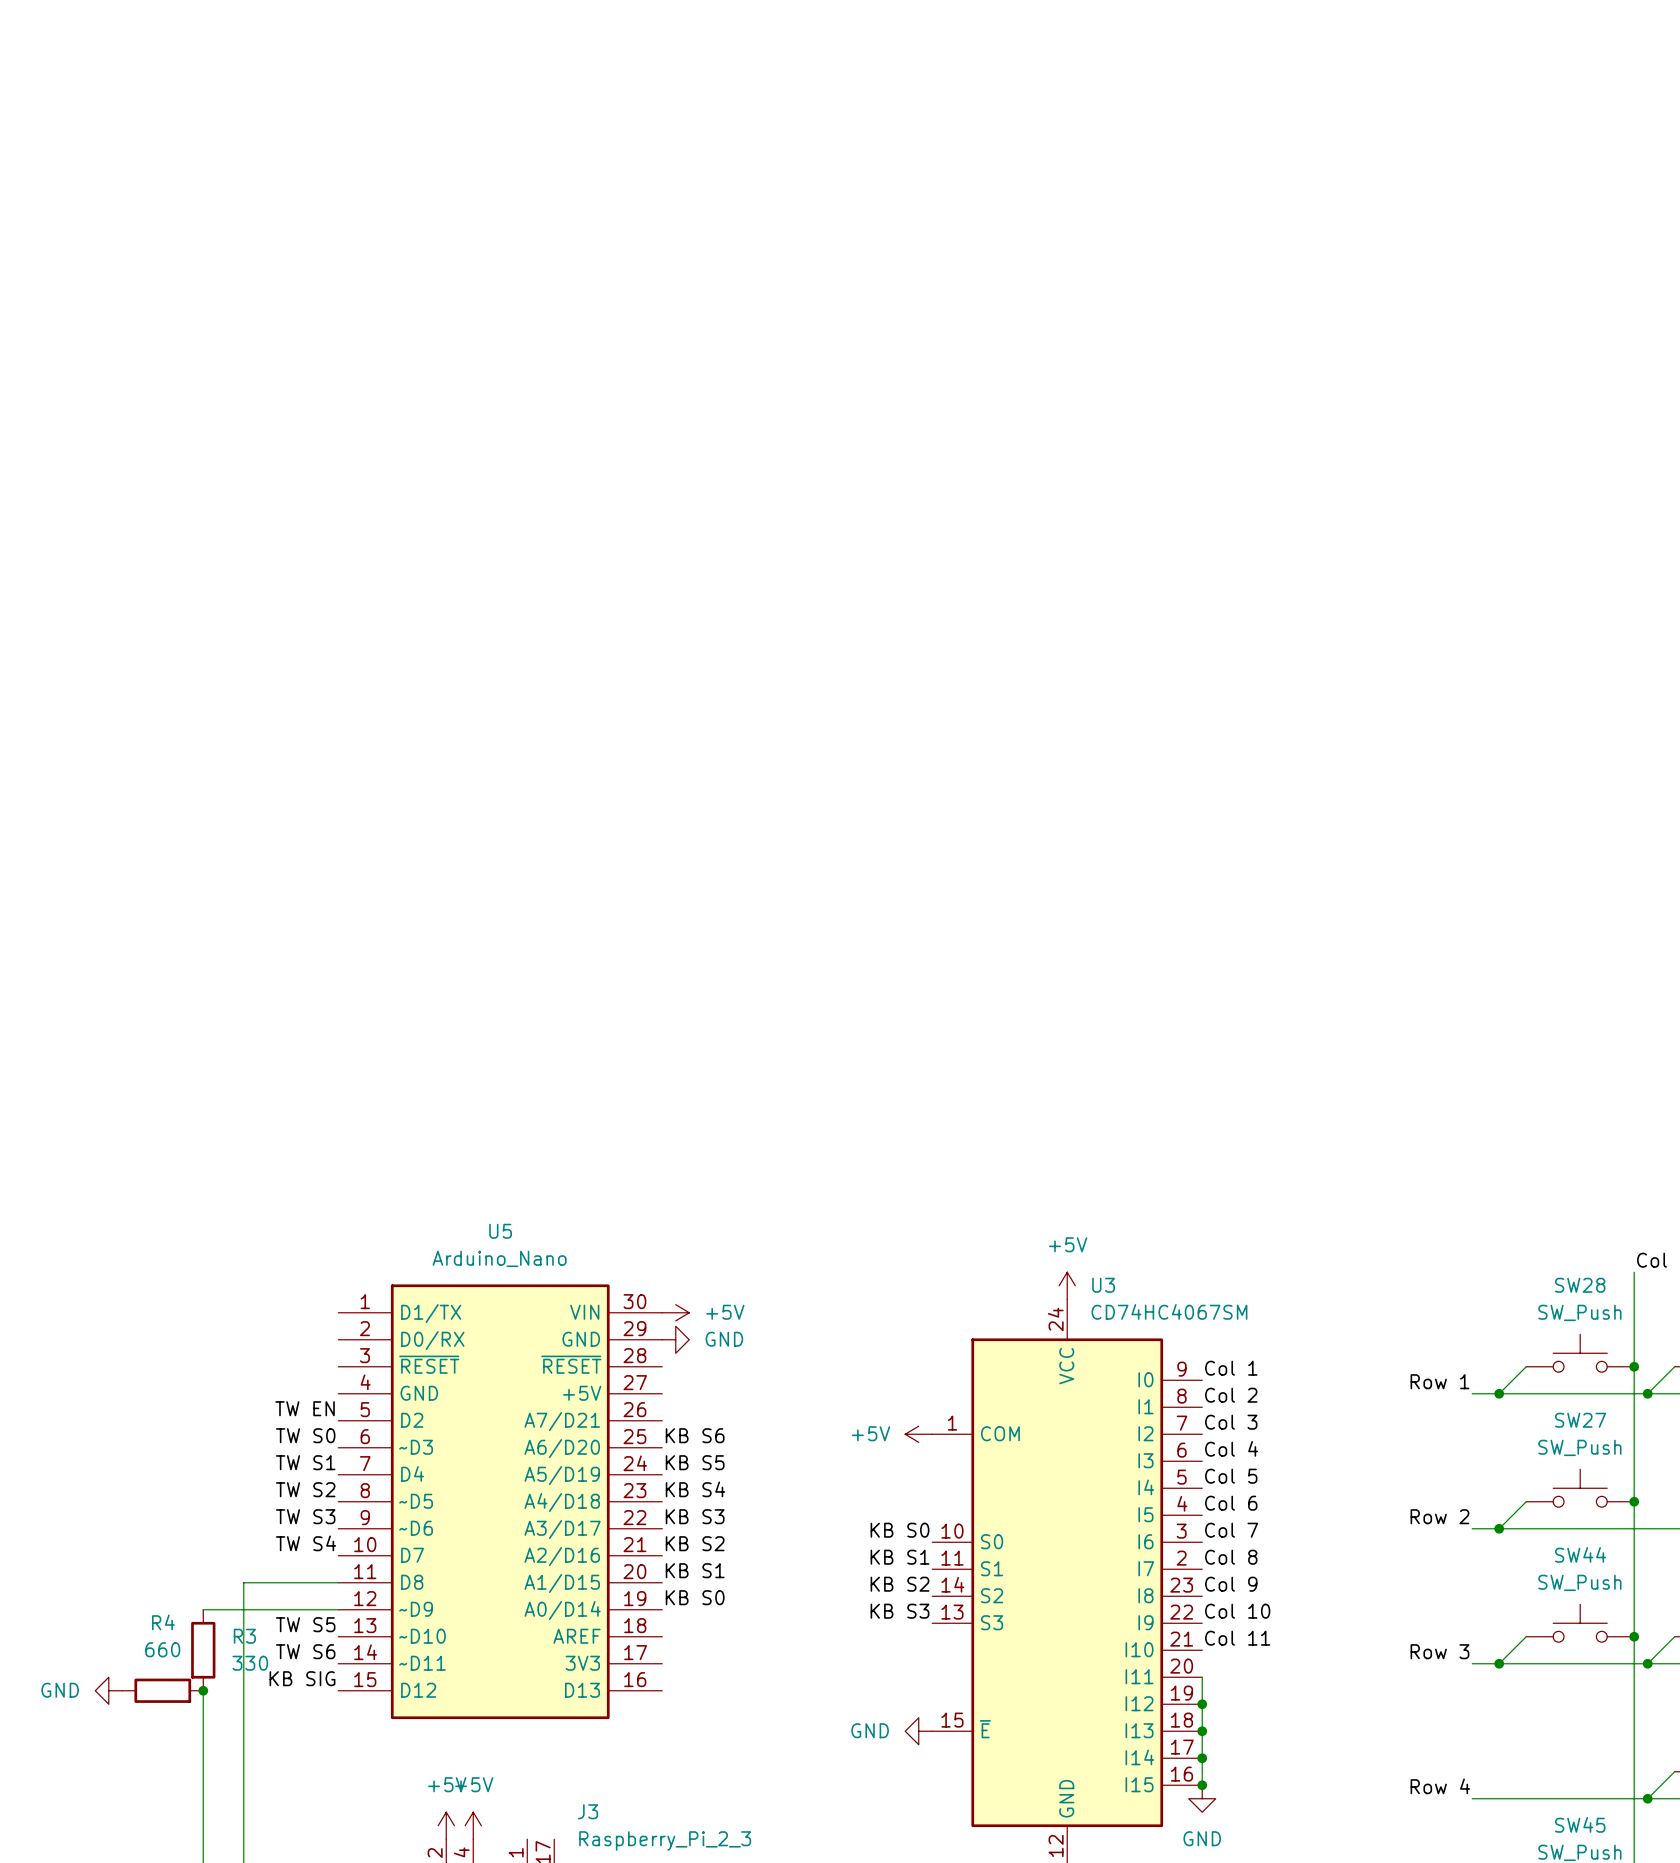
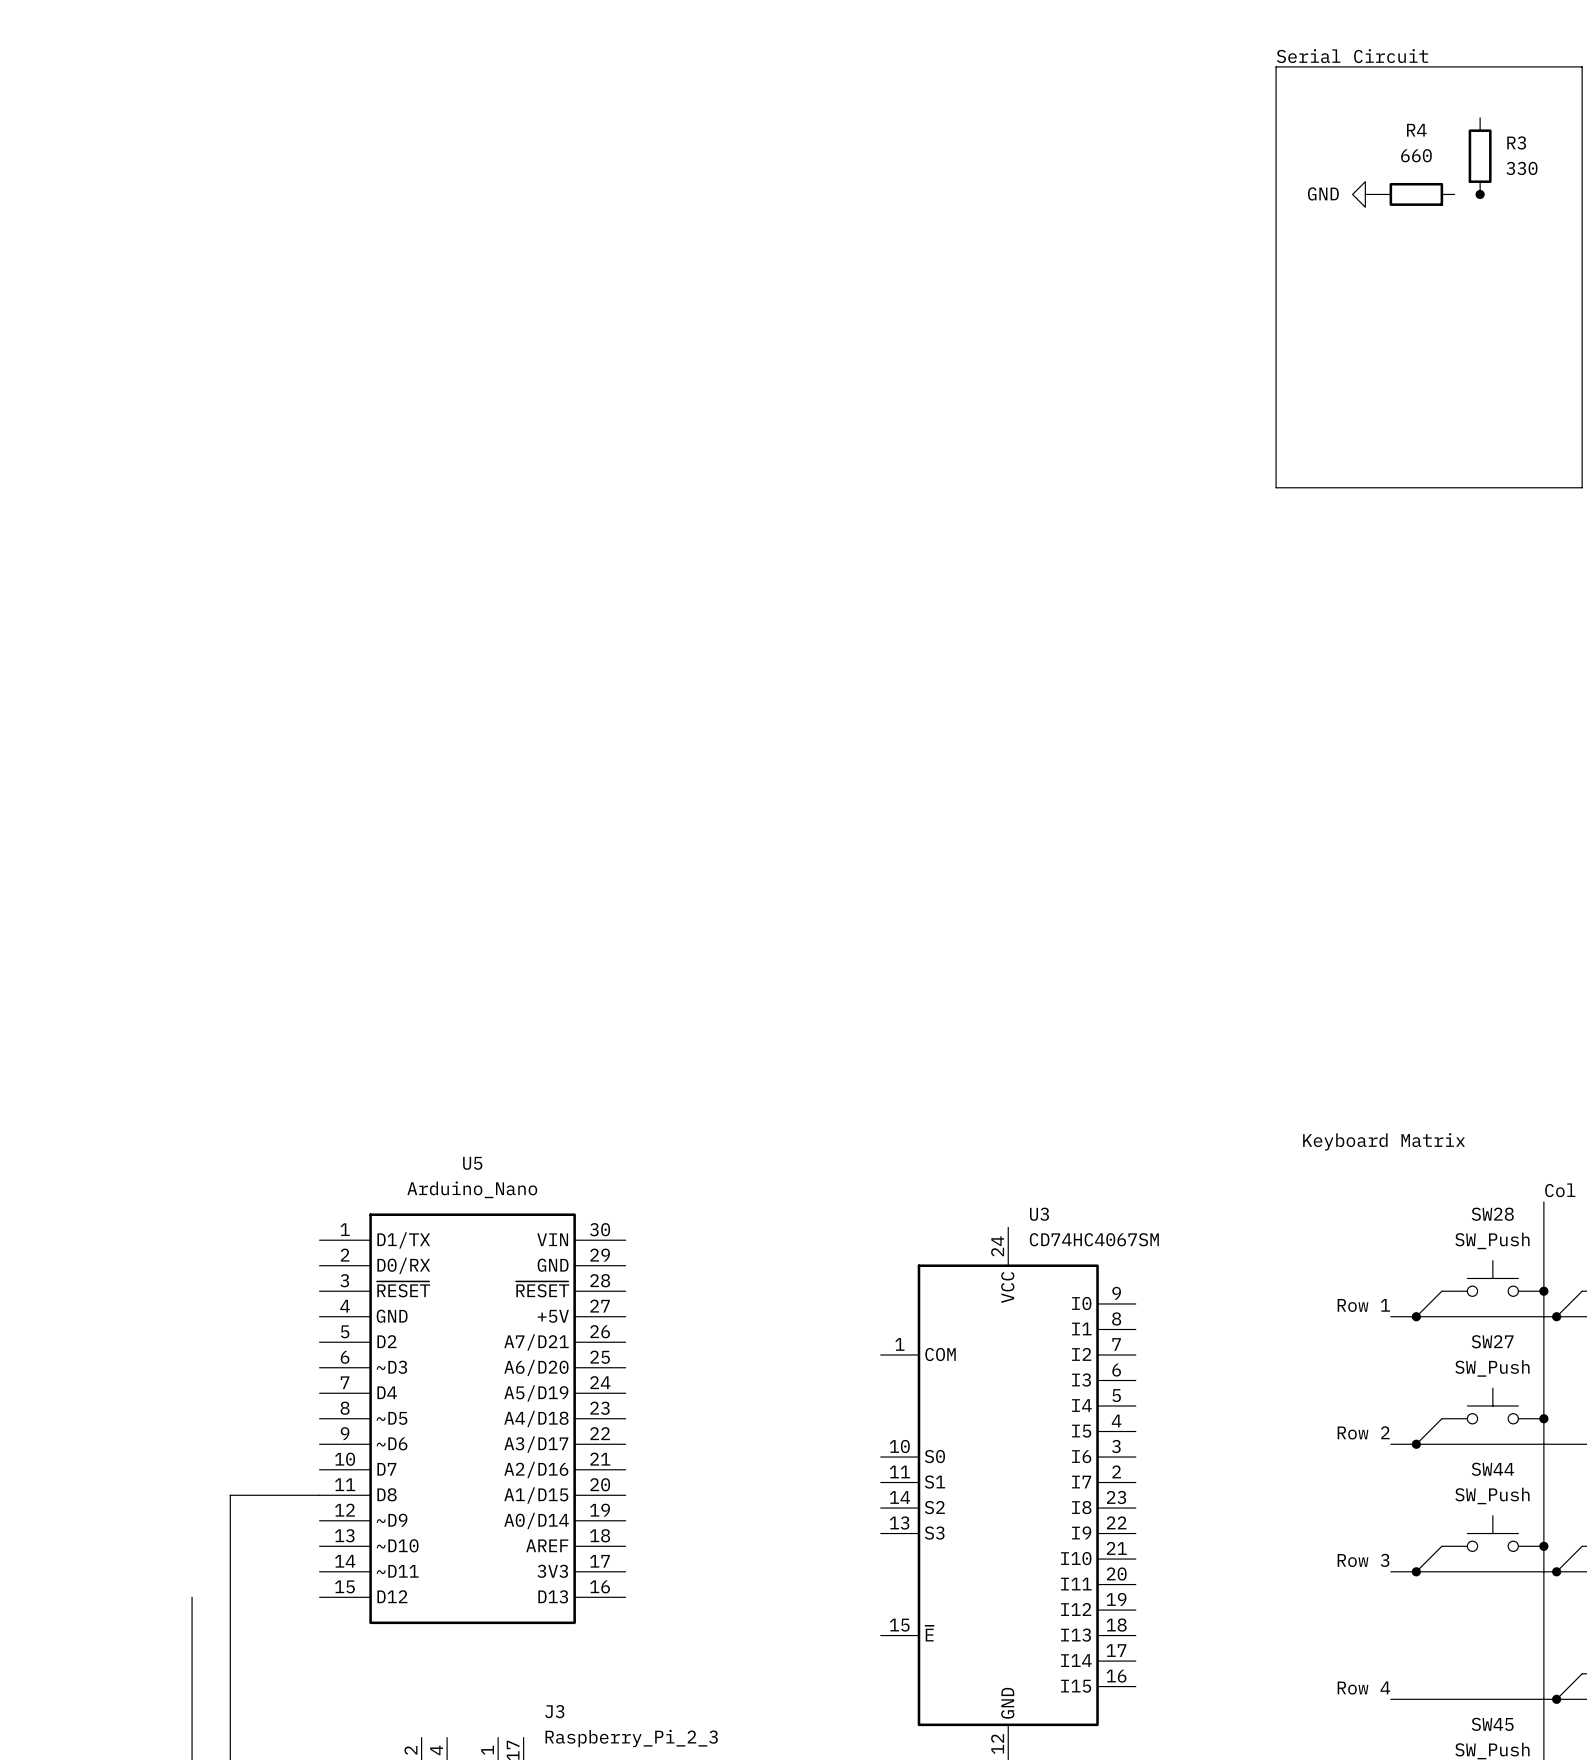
text: none -> Serial Circuit (1352, 56)
line: none -> (1276, 66) (1582, 66) (1582, 487) (1276, 487) (1276, 66)
power symbol: none -> GND (1365, 194)
junction: none -> (1480, 194)
text: none -> Keyboard Matrix (1384, 1141)
power symbol: +5V (1067, 1285) -> none
power symbol: +5V (675, 1312) -> none
power symbol: GND (675, 1339) -> none
label: Col 1 (1231, 1368) -> none
label: Col 2 (1231, 1395) -> none
label: TW EN (305, 1408) -> none
label: Col 3 (1231, 1422) -> none
power symbol: +5V (918, 1434) -> none
label: TW S0 (305, 1435) -> none
label: KB S6 (695, 1435) -> none
label: Col 4 (1231, 1448) -> none
label: TW S1 (305, 1462) -> none
label: KB S5 (695, 1462) -> none
label: Col 5 (1231, 1476) -> none
label: TW S2 (305, 1489) -> none
label: KB S4 (695, 1489) -> none
label: Col 6 (1231, 1503) -> none
label: TW S3 (305, 1516) -> none
label: KB S3 (695, 1516) -> none
label: KB S0 (900, 1530) -> none
label: Col 7 (1231, 1530) -> none
label: TW S4 (306, 1543) -> none
label: KB S2 (695, 1543) -> none
label: KB S1 (900, 1557) -> none
label: Col 8 (1231, 1557) -> none
label: KB S1 (695, 1570) -> none
label: KB S2 (900, 1584) -> none
label: Col 9 (1231, 1584) -> none
label: KB S0 (695, 1597) -> none
wire: (203, 1609) (338, 1609) -> none
label: KB S3 (900, 1611) -> none
label: Col 10 (1237, 1611) -> none
label: TW S5 (305, 1624) -> none
label: Col 11 (1237, 1638) -> none
R3 position: (203, 1650) -> (1480, 156)
label: TW S6 (305, 1651) -> none
wire: (1202, 1677) (1202, 1785) -> none
label: KB SIG (302, 1678) -> none
power symbol: GND (108, 1690) -> none
R4 position: (162, 1690) -> (1416, 194)
junction: (203, 1690) -> none
junction: (1202, 1704) -> none
power symbol: GND (918, 1731) -> none
junction: (1202, 1731) -> none
junction: (1202, 1758) -> none
junction: (1202, 1785) -> none
power symbol: GND (1202, 1798) -> none
power symbol: +5V (446, 1825) -> none
power symbol: +5V (473, 1825) -> none

